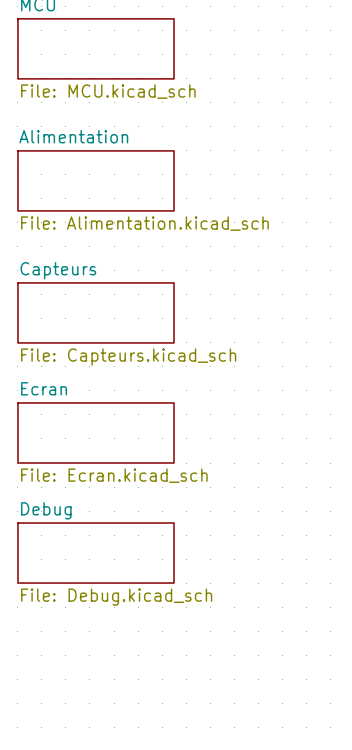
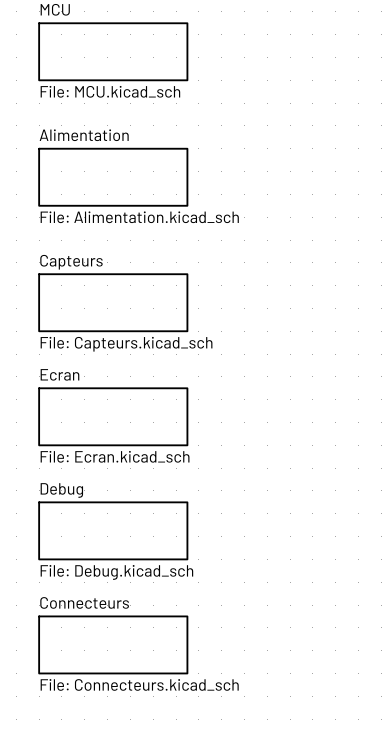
sheet Connecteurs: none -> File: Connecteurs.kicad_sch (113, 644)

